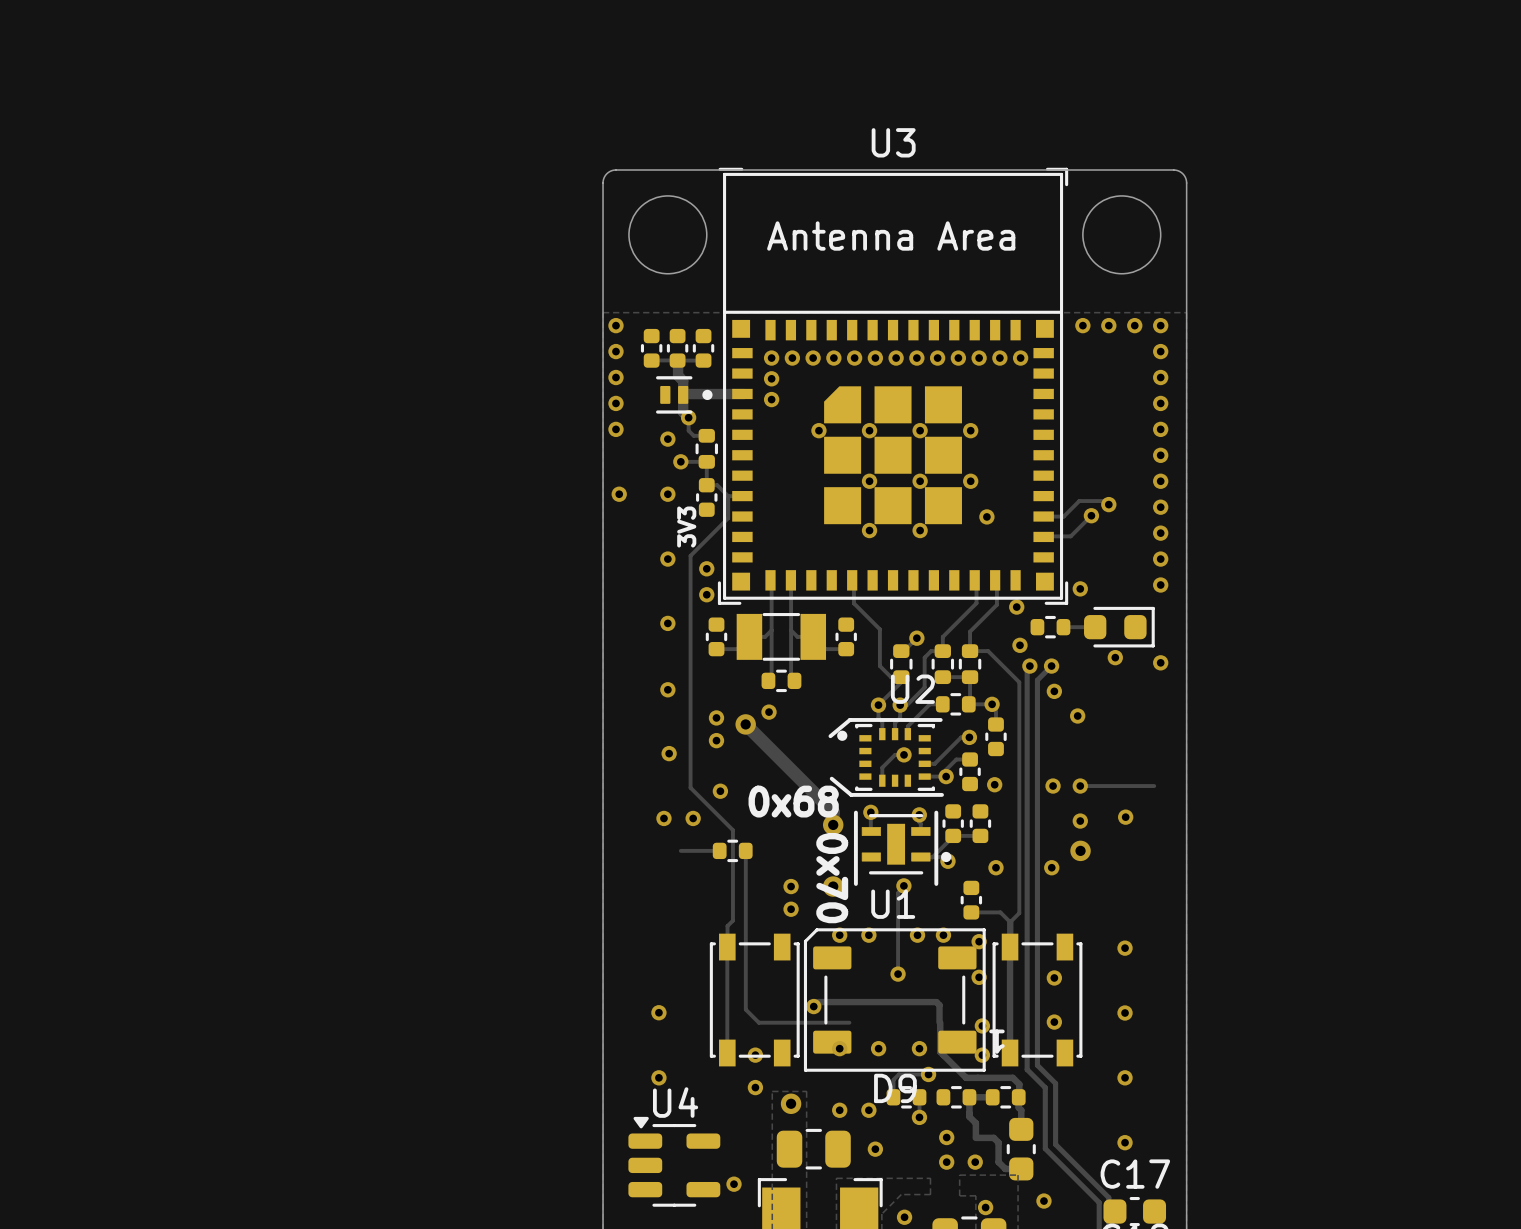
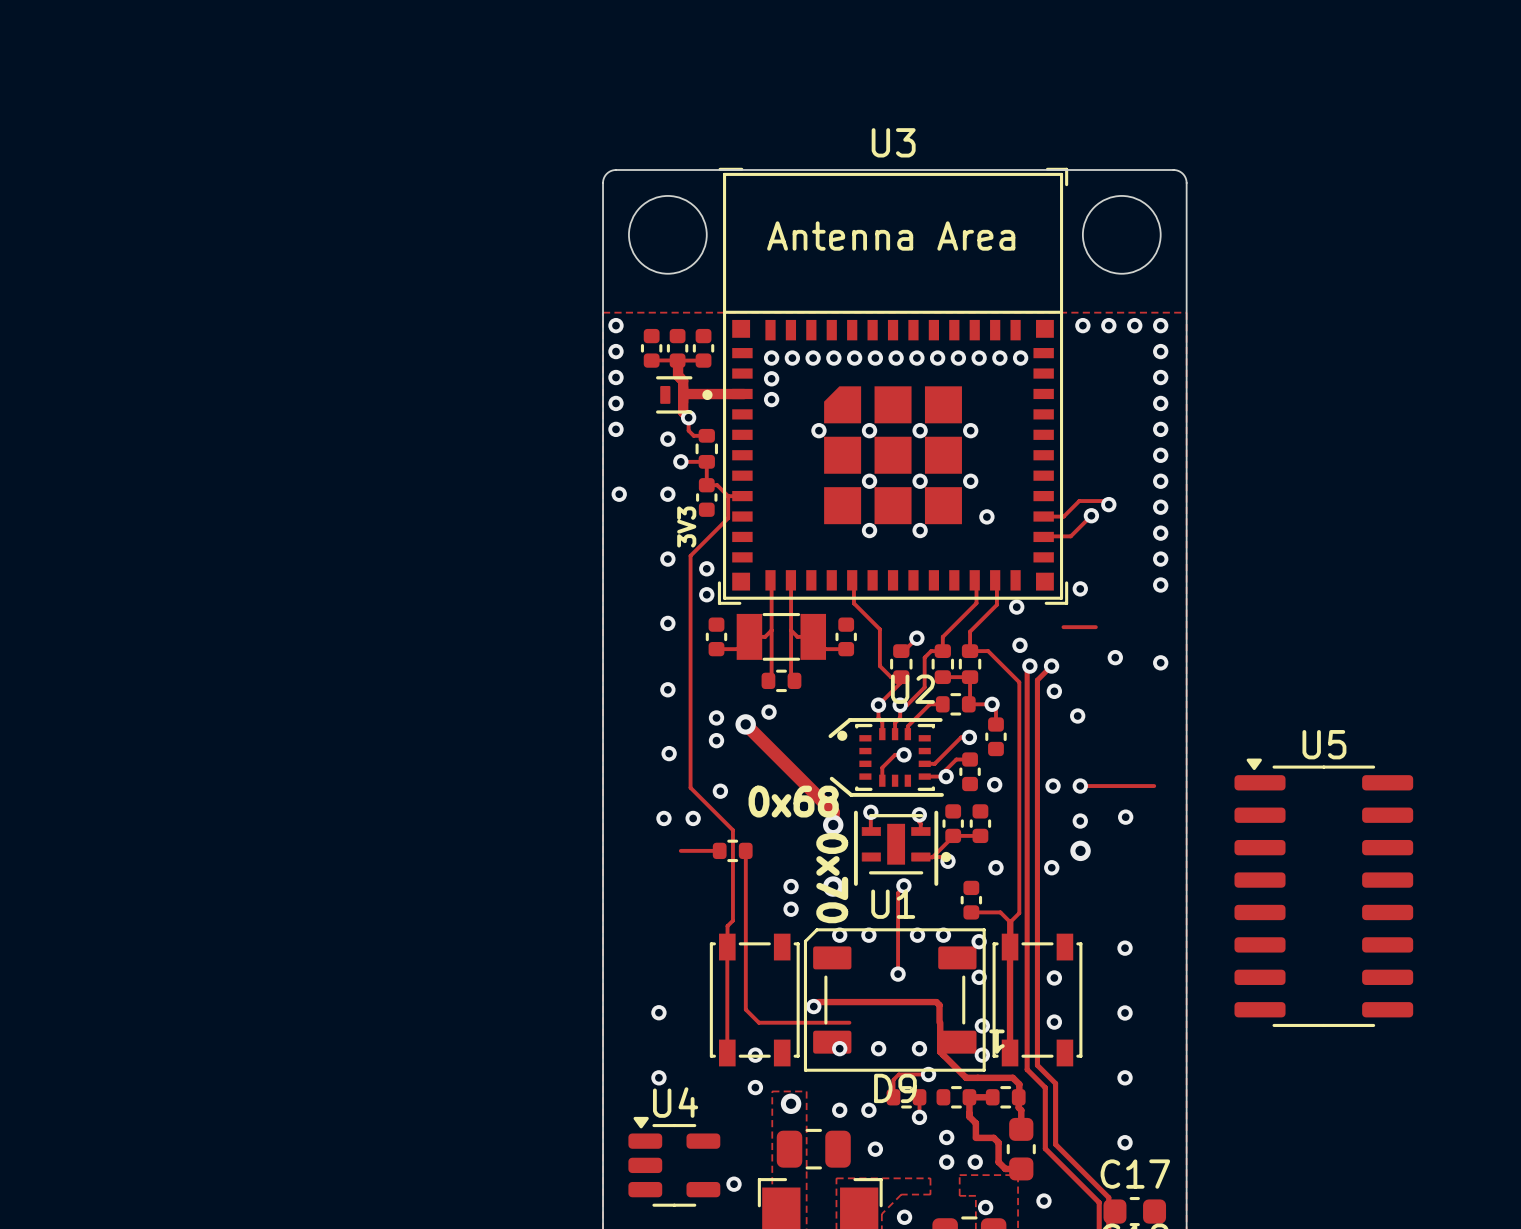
part: (1050, 627) -> none
part: (1119, 627) -> none
U5: none -> (1323, 892)

